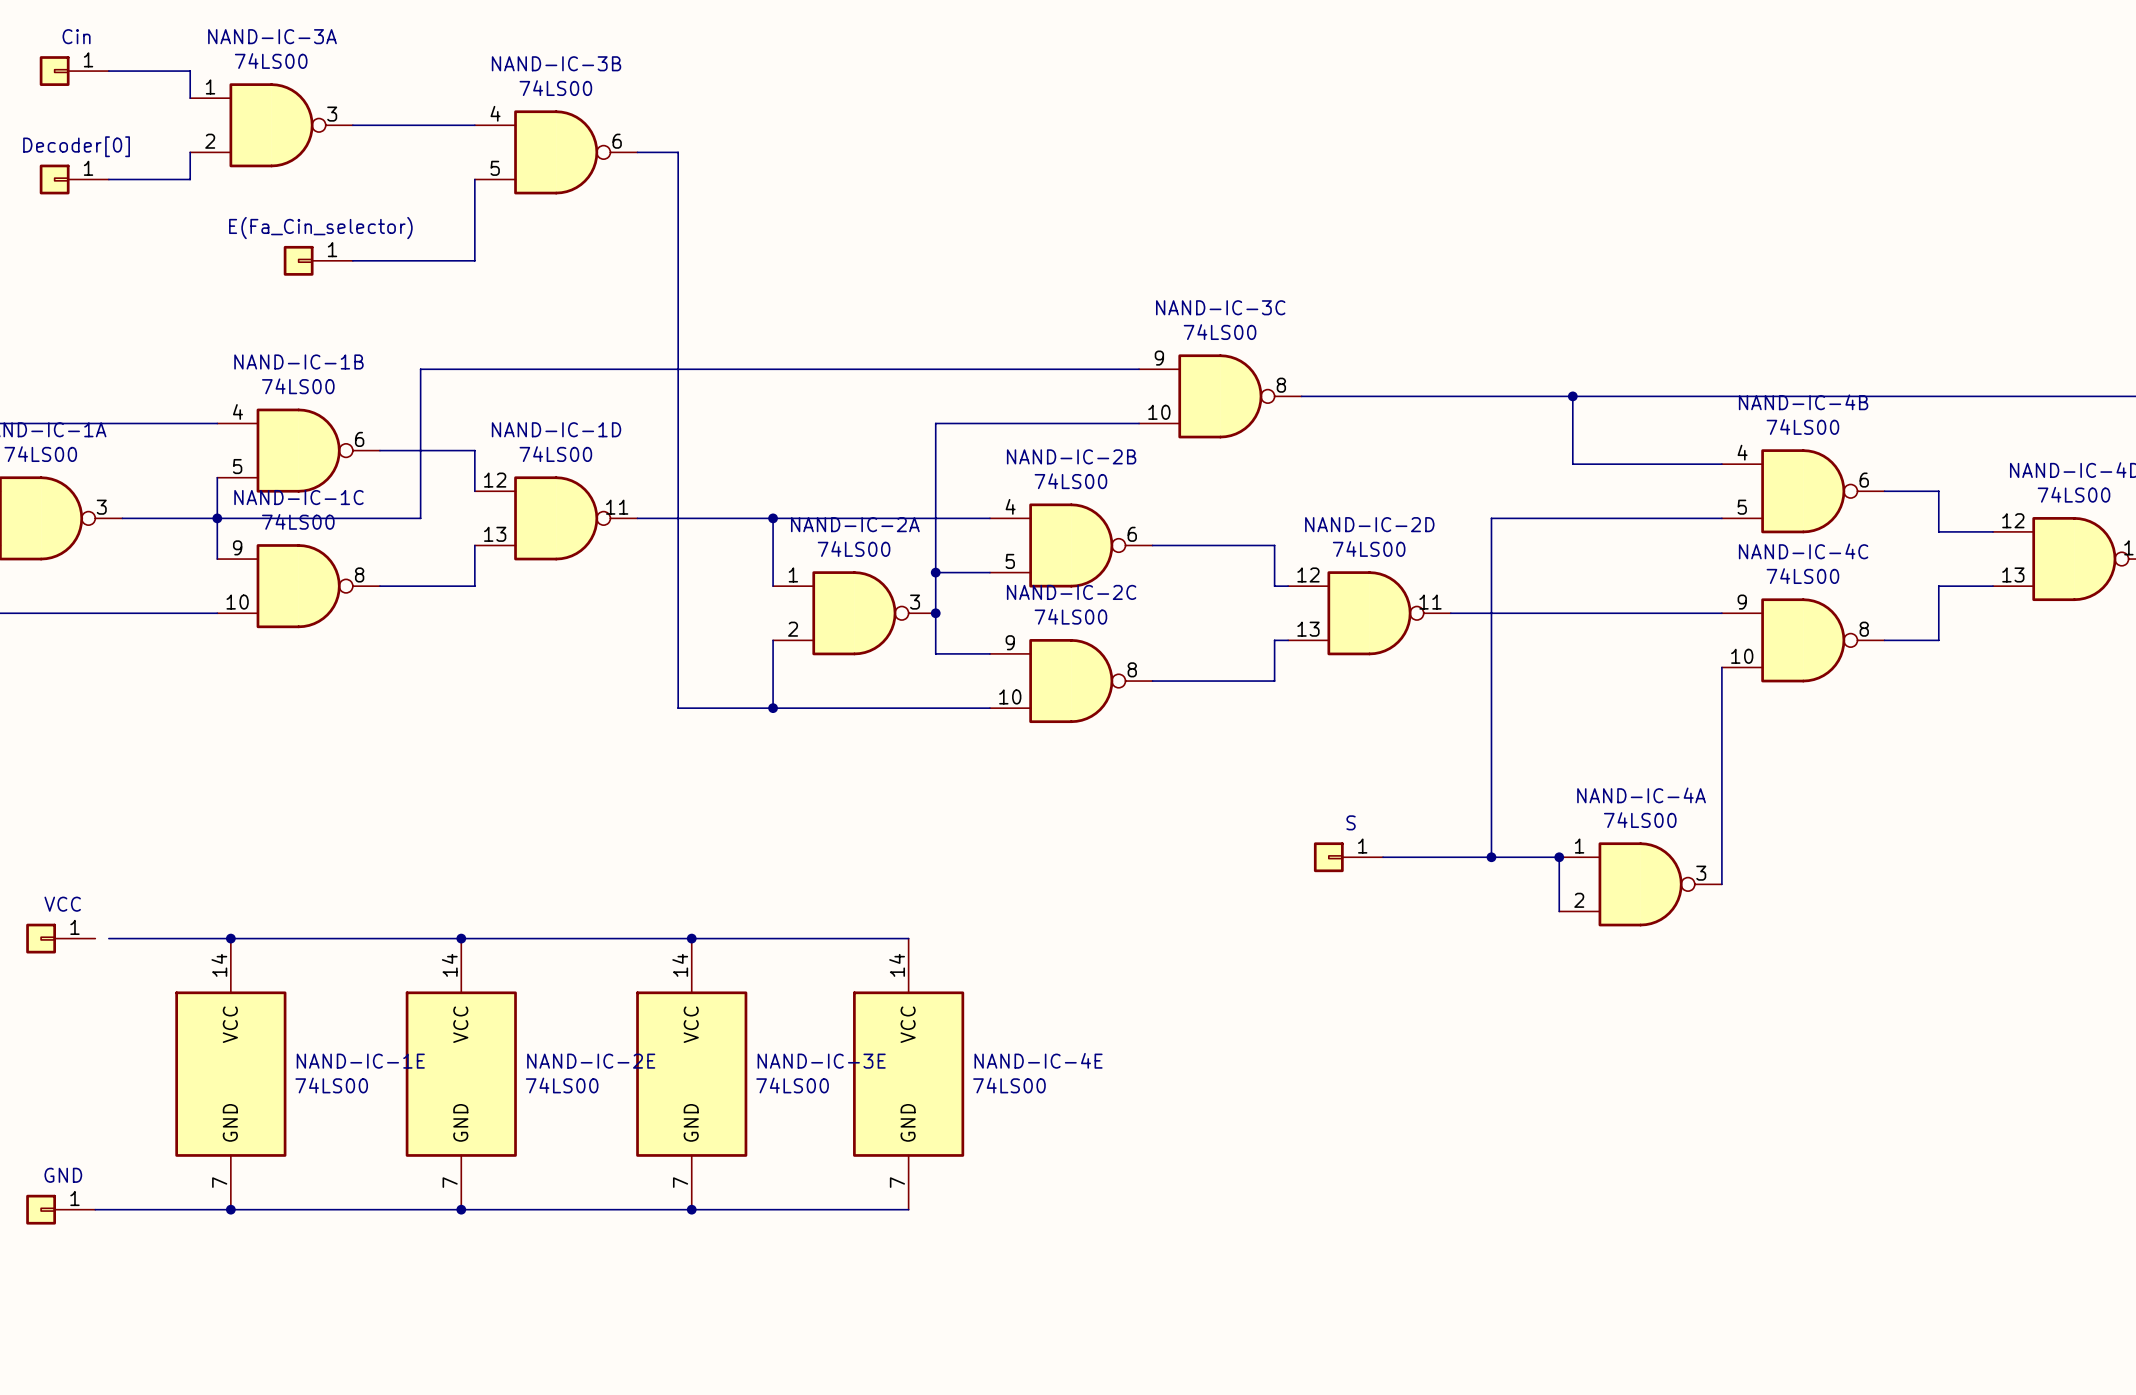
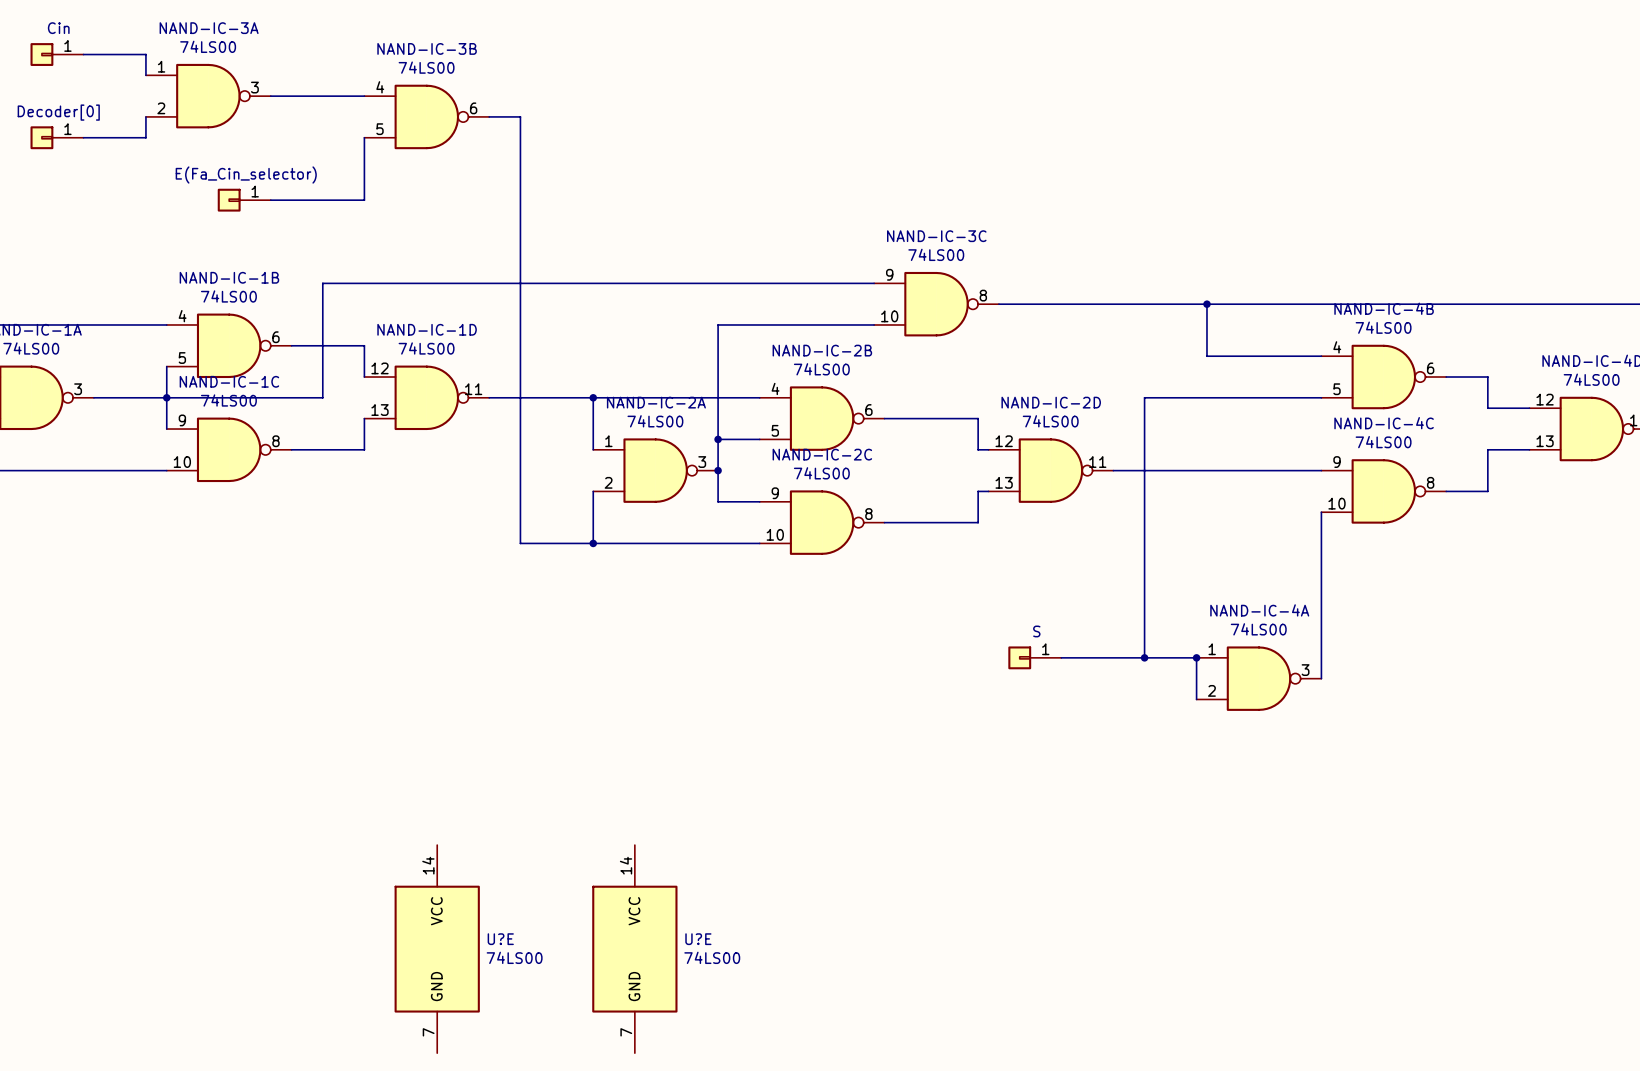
VCC: (60, 938) -> none
wire: (108, 938) (908, 938) -> none
junction: (230, 938) -> none
junction: (461, 938) -> none
junction: (691, 938) -> none
NAND-IC-1E: 74LS00 (230, 1074) -> none
NAND-IC-2E: 74LS00 (461, 1074) -> none
NAND-IC-3E: 74LS00 (691, 1074) -> none
NAND-IC-4E: 74LS00 (908, 1074) -> none
GND: (60, 1209) -> none
wire: (95, 1209) (908, 1209) -> none
junction: (230, 1209) -> none
junction: (461, 1209) -> none
junction: (691, 1209) -> none
U?E: none -> 74LS00 (437, 949)
U?E: none -> 74LS00 (634, 949)

